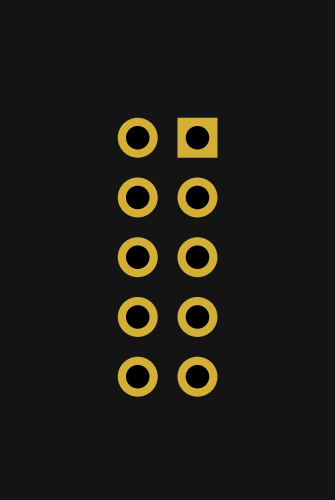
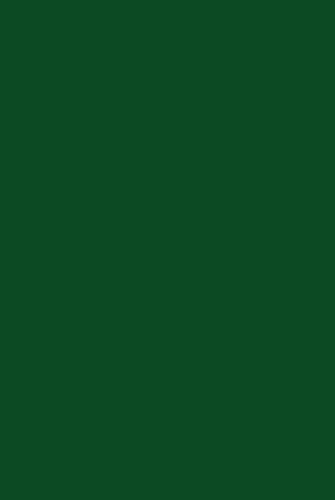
part: (167, 257) -> none

